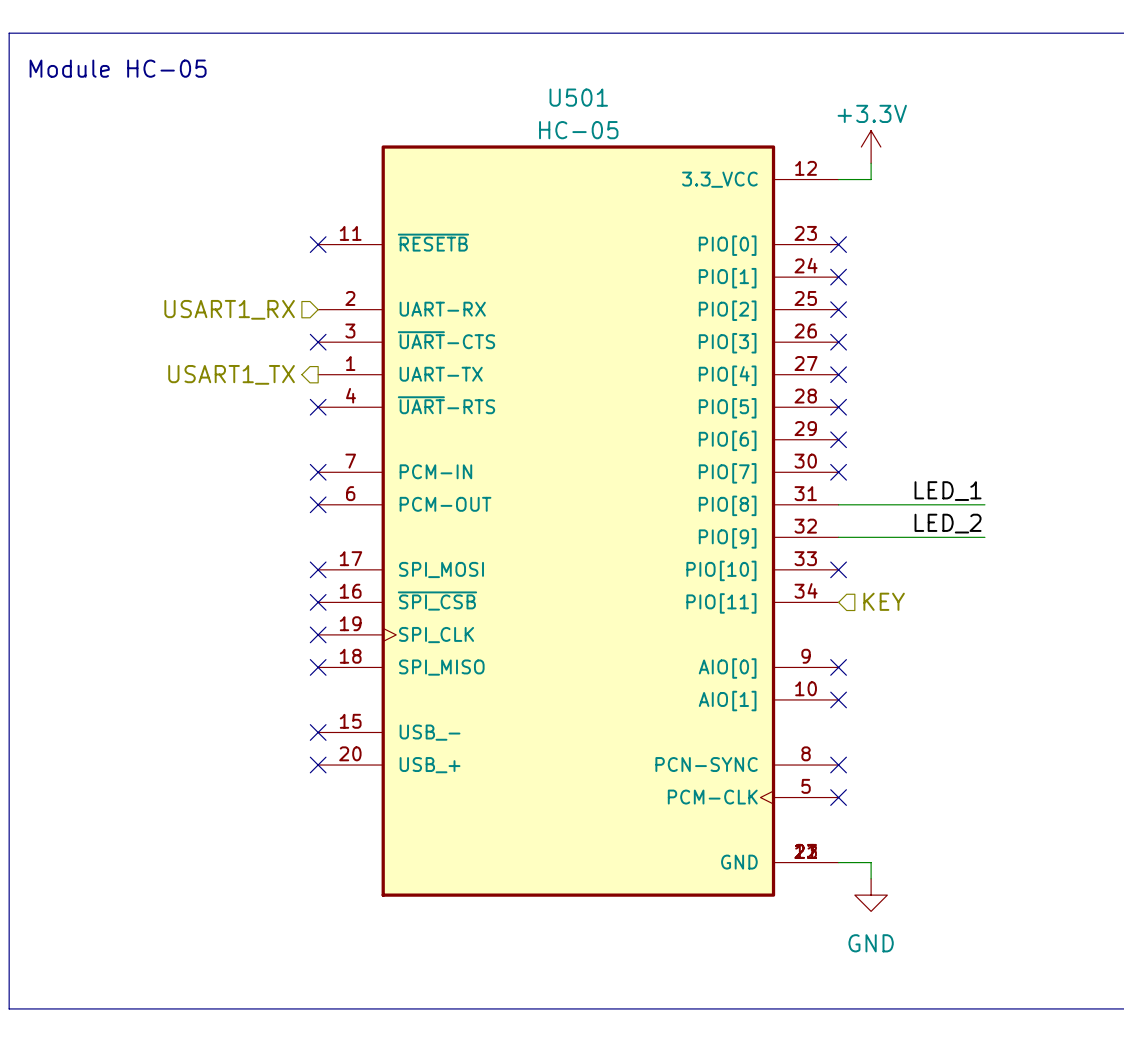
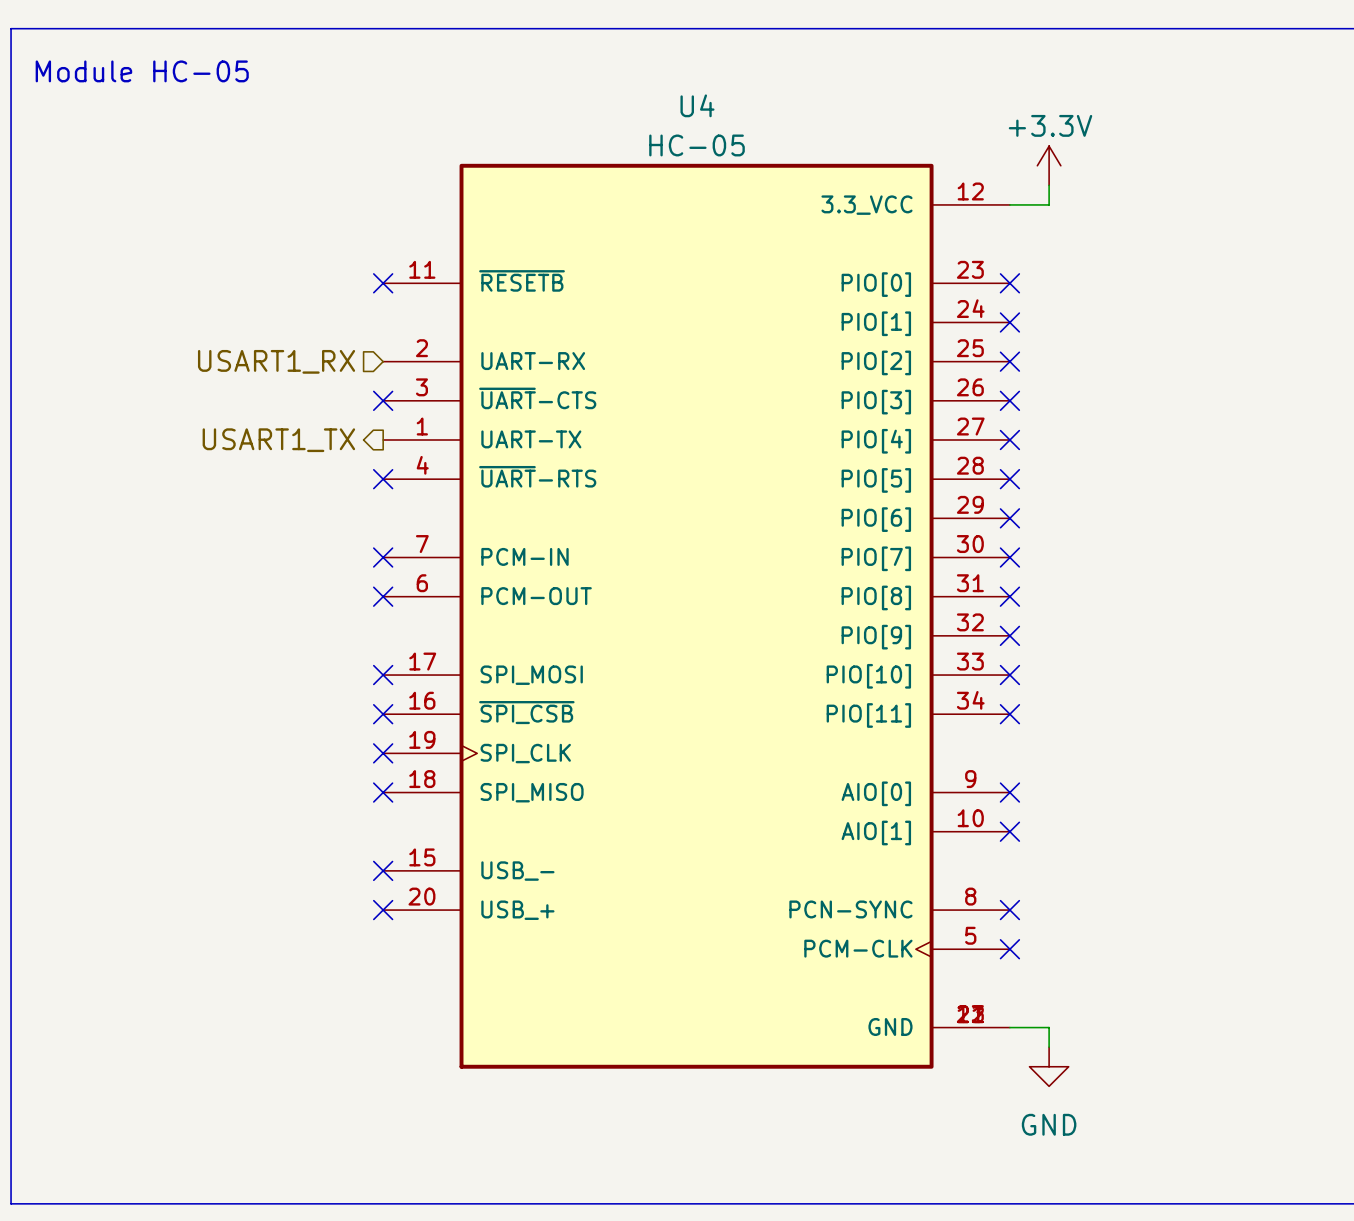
U501 name: U501 (578, 97) -> U4 (697, 105)
label: LED_1 (948, 491) -> none
wire: (838, 504) (984, 504) -> none
no-connect mark: none -> (1009, 596)
label: LED_2 (948, 523) -> none
wire: (838, 537) (984, 537) -> none
no-connect mark: none -> (1009, 635)
hierarchical label: KEY (884, 601) -> none
no-connect mark: none -> (1009, 714)

